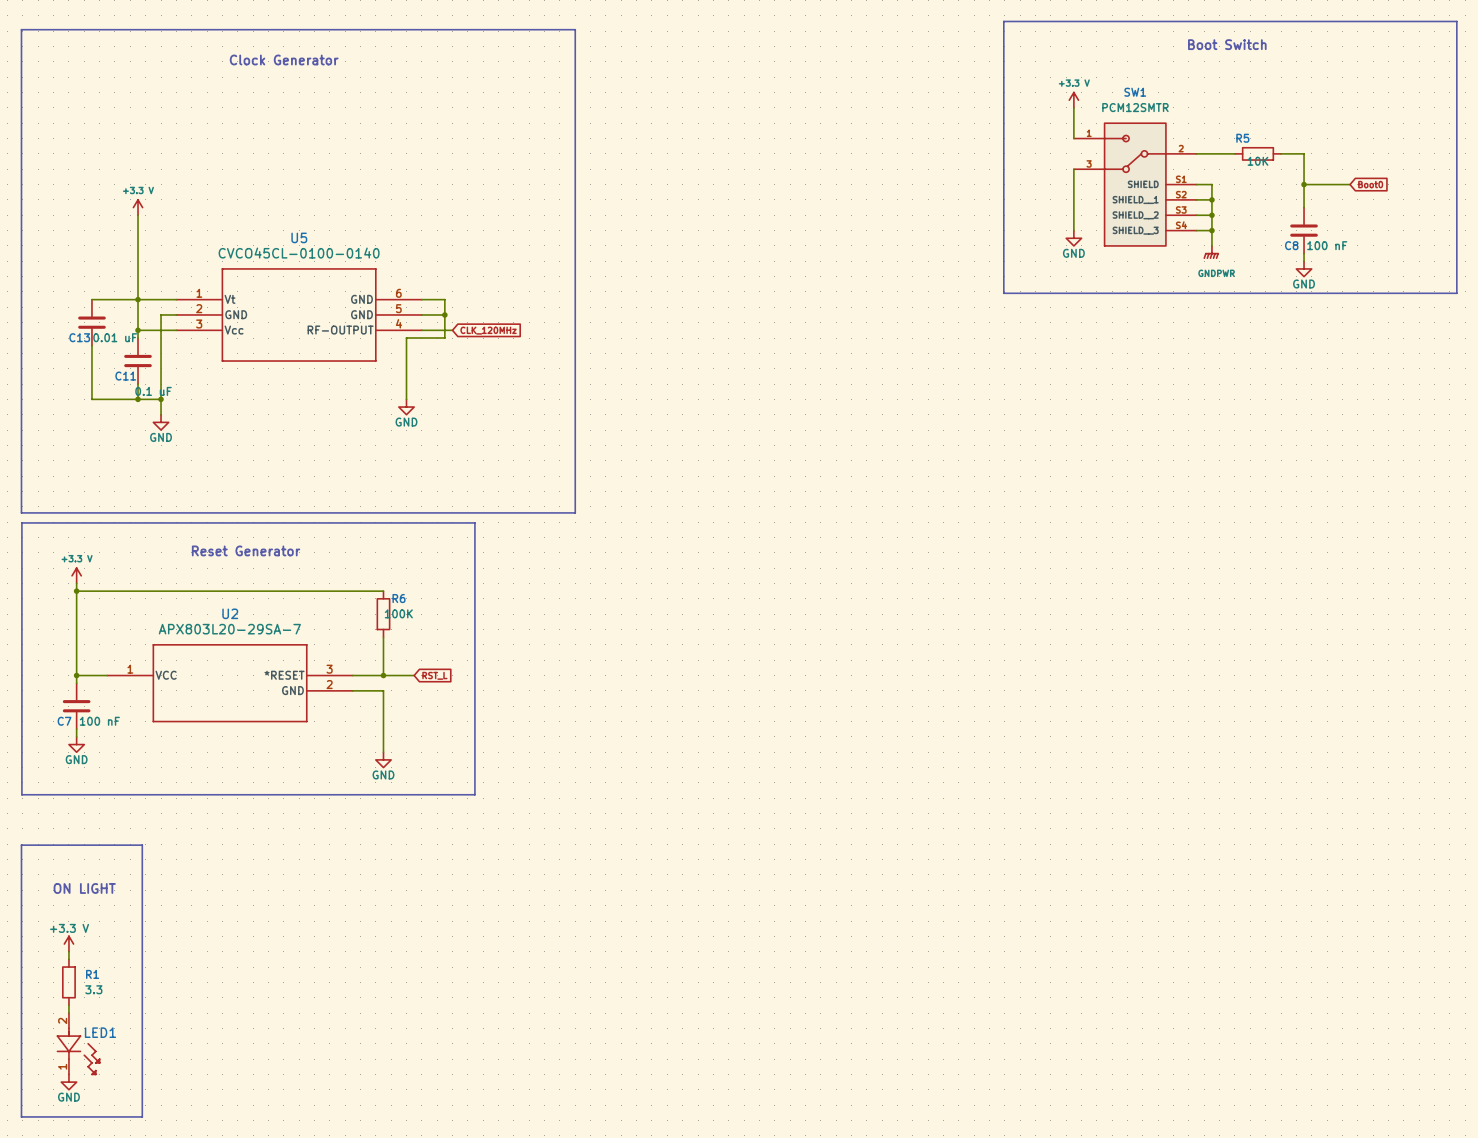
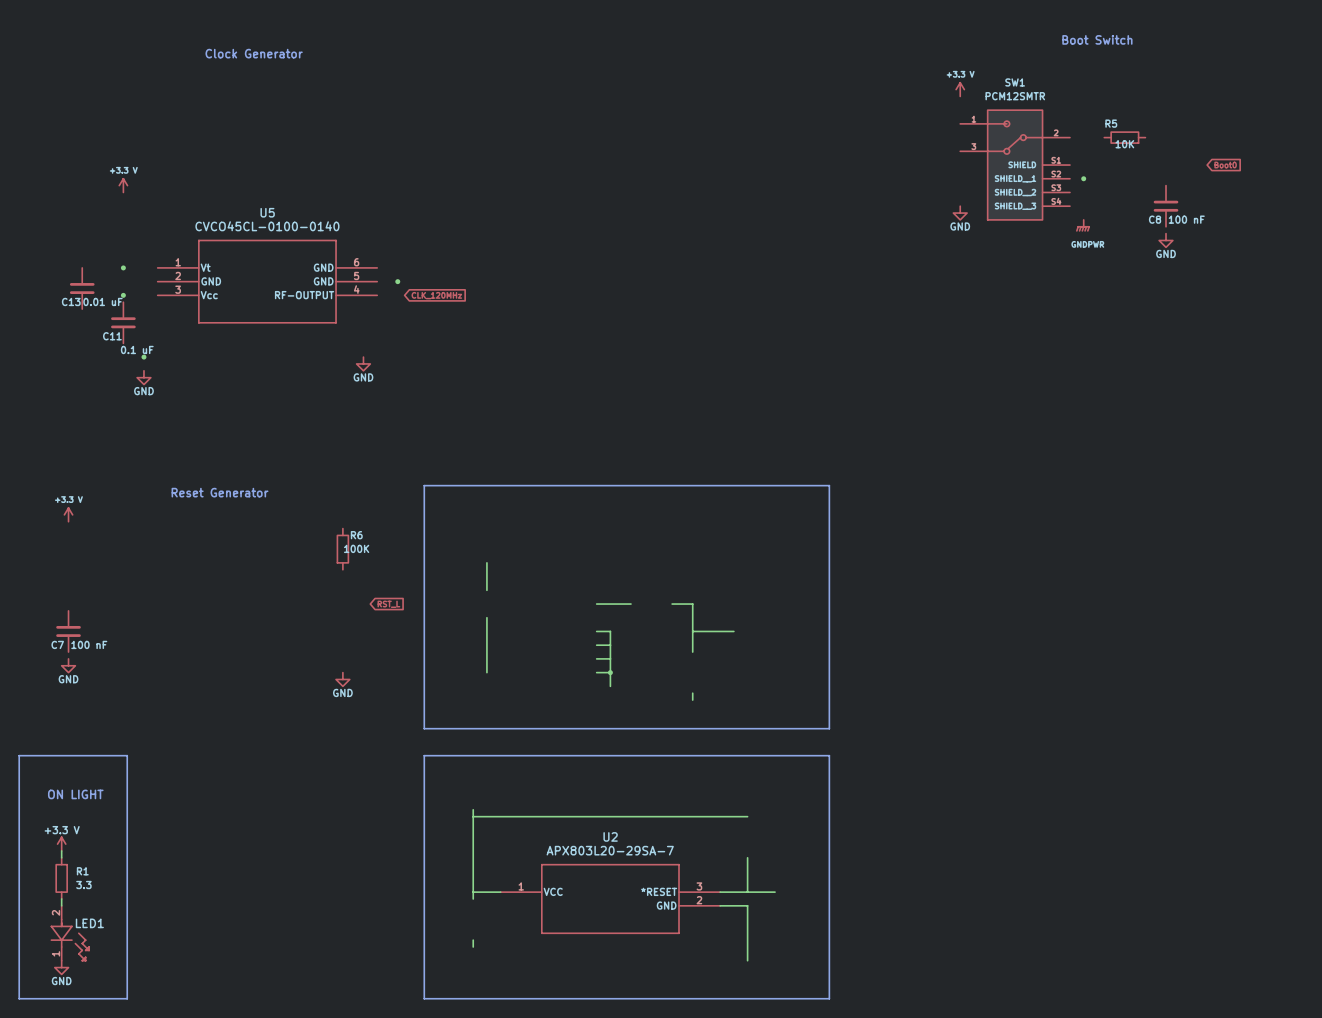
line: (1003, 21) (1456, 21) (1456, 293) (1003, 293) (1003, 21) -> none
line: (21, 29) (21, 512) (575, 512) (575, 29) (21, 29) -> none
wire: (1073, 107) (1073, 138) -> none
wire: (1196, 153) (1234, 153) -> none
wire: (1281, 153) (1304, 153) (1304, 207) -> none
wire: (1073, 169) (1073, 230) -> none
wire: (1196, 184) (1211, 184) (1211, 245) -> none
wire: (1304, 184) (1350, 184) -> none
junction: (1304, 184) -> none
wire: (1196, 199) (1211, 199) -> none
wire: (138, 215) (138, 338) -> none
wire: (1196, 215) (1211, 215) -> none
junction: (1211, 215) -> none
wire: (1196, 230) (1211, 230) -> none
junction: (1211, 230) -> none
wire: (1304, 253) (1304, 261) -> none
wire: (91, 299) (176, 299) -> none
wire: (421, 299) (444, 299) (444, 338) (406, 338) (406, 399) -> none
wire: (176, 314) (161, 314) (161, 414) -> none
wire: (421, 314) (444, 314) -> none
wire: (138, 330) (176, 330) -> none
wire: (421, 330) (452, 330) -> none
wire: (91, 345) (91, 399) (161, 399) -> none
wire: (138, 384) (138, 399) -> none
junction: (138, 399) -> none
line: (21, 522) (474, 522) (474, 794) (21, 794) (21, 522) -> none
line: none -> (424, 485) (829, 485) (829, 728) (424, 728) (424, 485)
wire: (76, 583) (76, 683) -> none
wire: (76, 591) (383, 591) -> none
junction: (76, 591) -> none
wire: none -> (486, 562) (486, 590)
wire: (383, 637) (383, 675) -> none
wire: (76, 675) (107, 675) -> none
junction: (76, 675) -> none
wire: (352, 675) (414, 675) -> none
junction: (383, 675) -> none
wire: none -> (596, 604) (630, 604)
wire: none -> (672, 604) (692, 604) (692, 652)
U2 position: (230, 683) -> (610, 898)
wire: (352, 690) (383, 690) (383, 752) -> none
wire: none -> (486, 617) (486, 672)
wire: none -> (596, 631) (610, 631) (610, 686)
wire: none -> (692, 631) (733, 631)
wire: none -> (596, 645) (610, 645)
wire: (76, 729) (76, 736) -> none
wire: none -> (596, 658) (610, 658)
wire: none -> (596, 672) (610, 672)
junction: none -> (610, 672)
wire: none -> (692, 693) (692, 700)
line: none -> (424, 755) (829, 755) (829, 998) (424, 998) (424, 755)
wire: none -> (473, 809) (473, 898)
wire: none -> (473, 816) (747, 816)
wire: none -> (747, 857) (747, 892)
wire: none -> (473, 892) (500, 892)
wire: none -> (720, 892) (775, 892)
wire: none -> (720, 905) (747, 905) (747, 960)
wire: none -> (473, 940) (473, 947)

